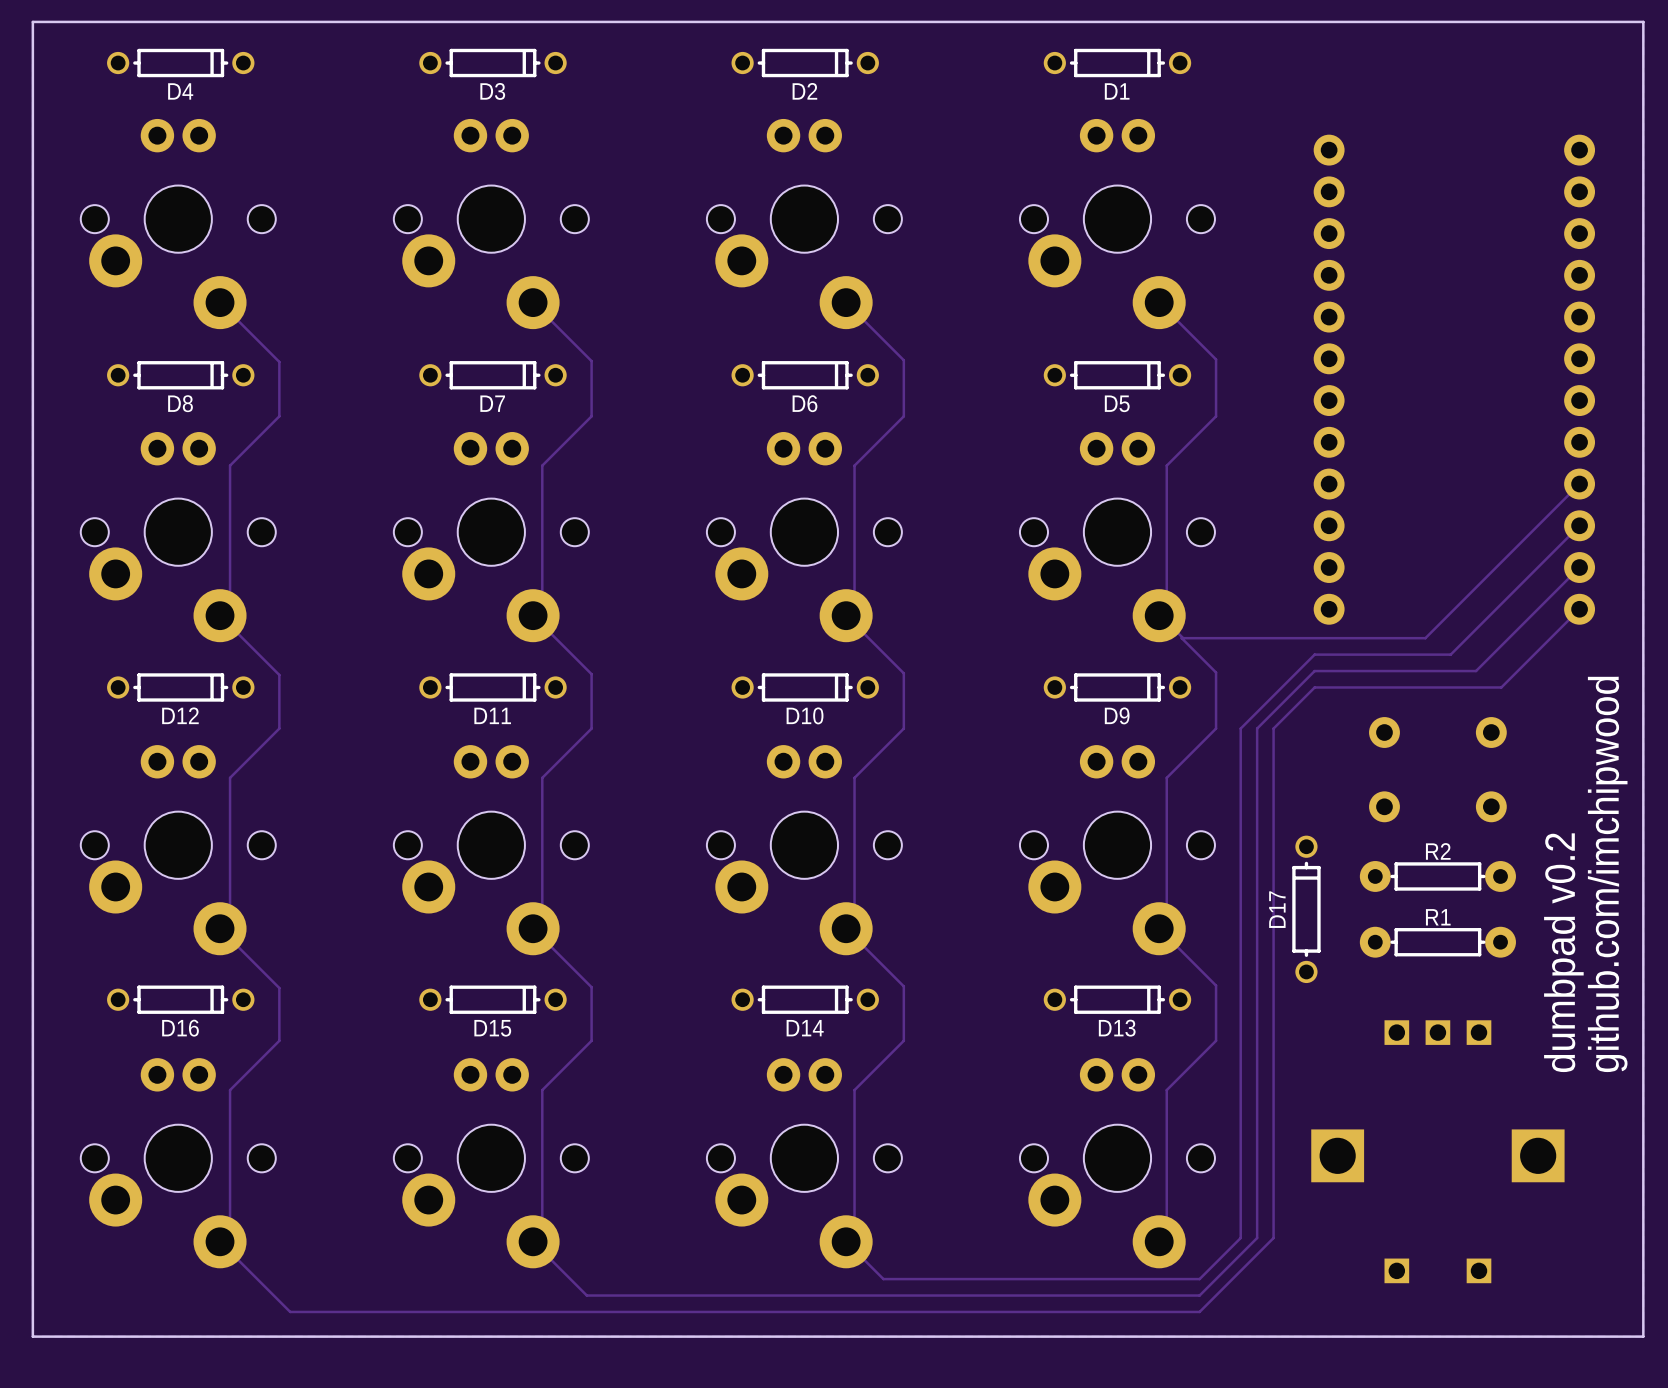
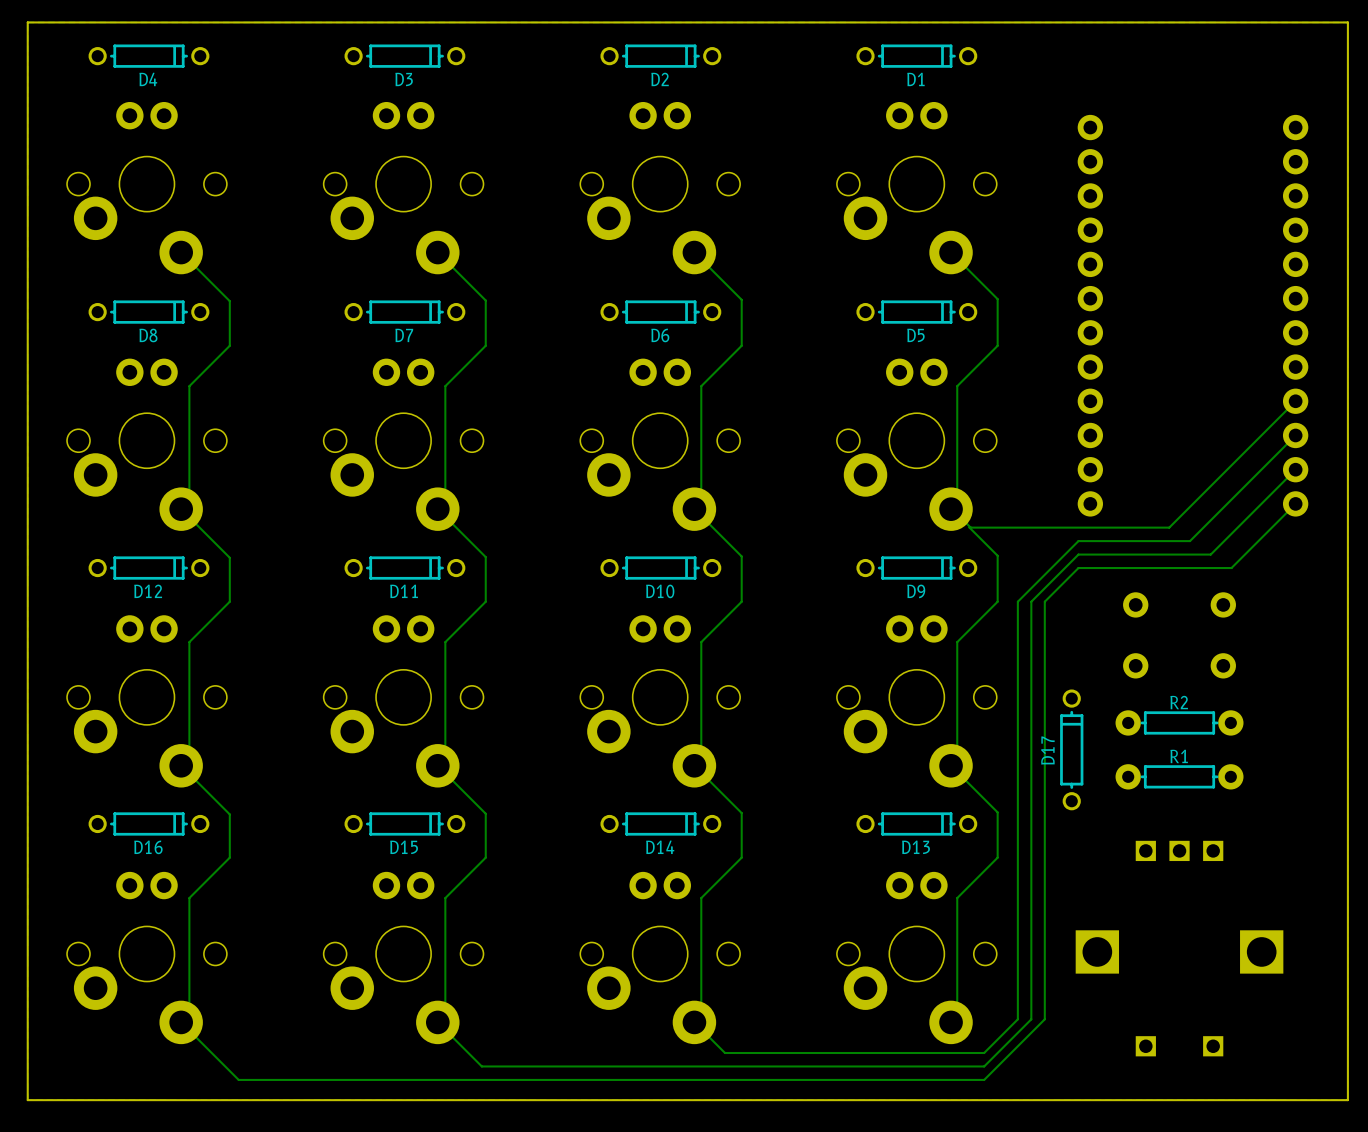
text: github.com/imchipwood (1607, 874) -> none
text: dumbpad v0.2 (1563, 952) -> none

